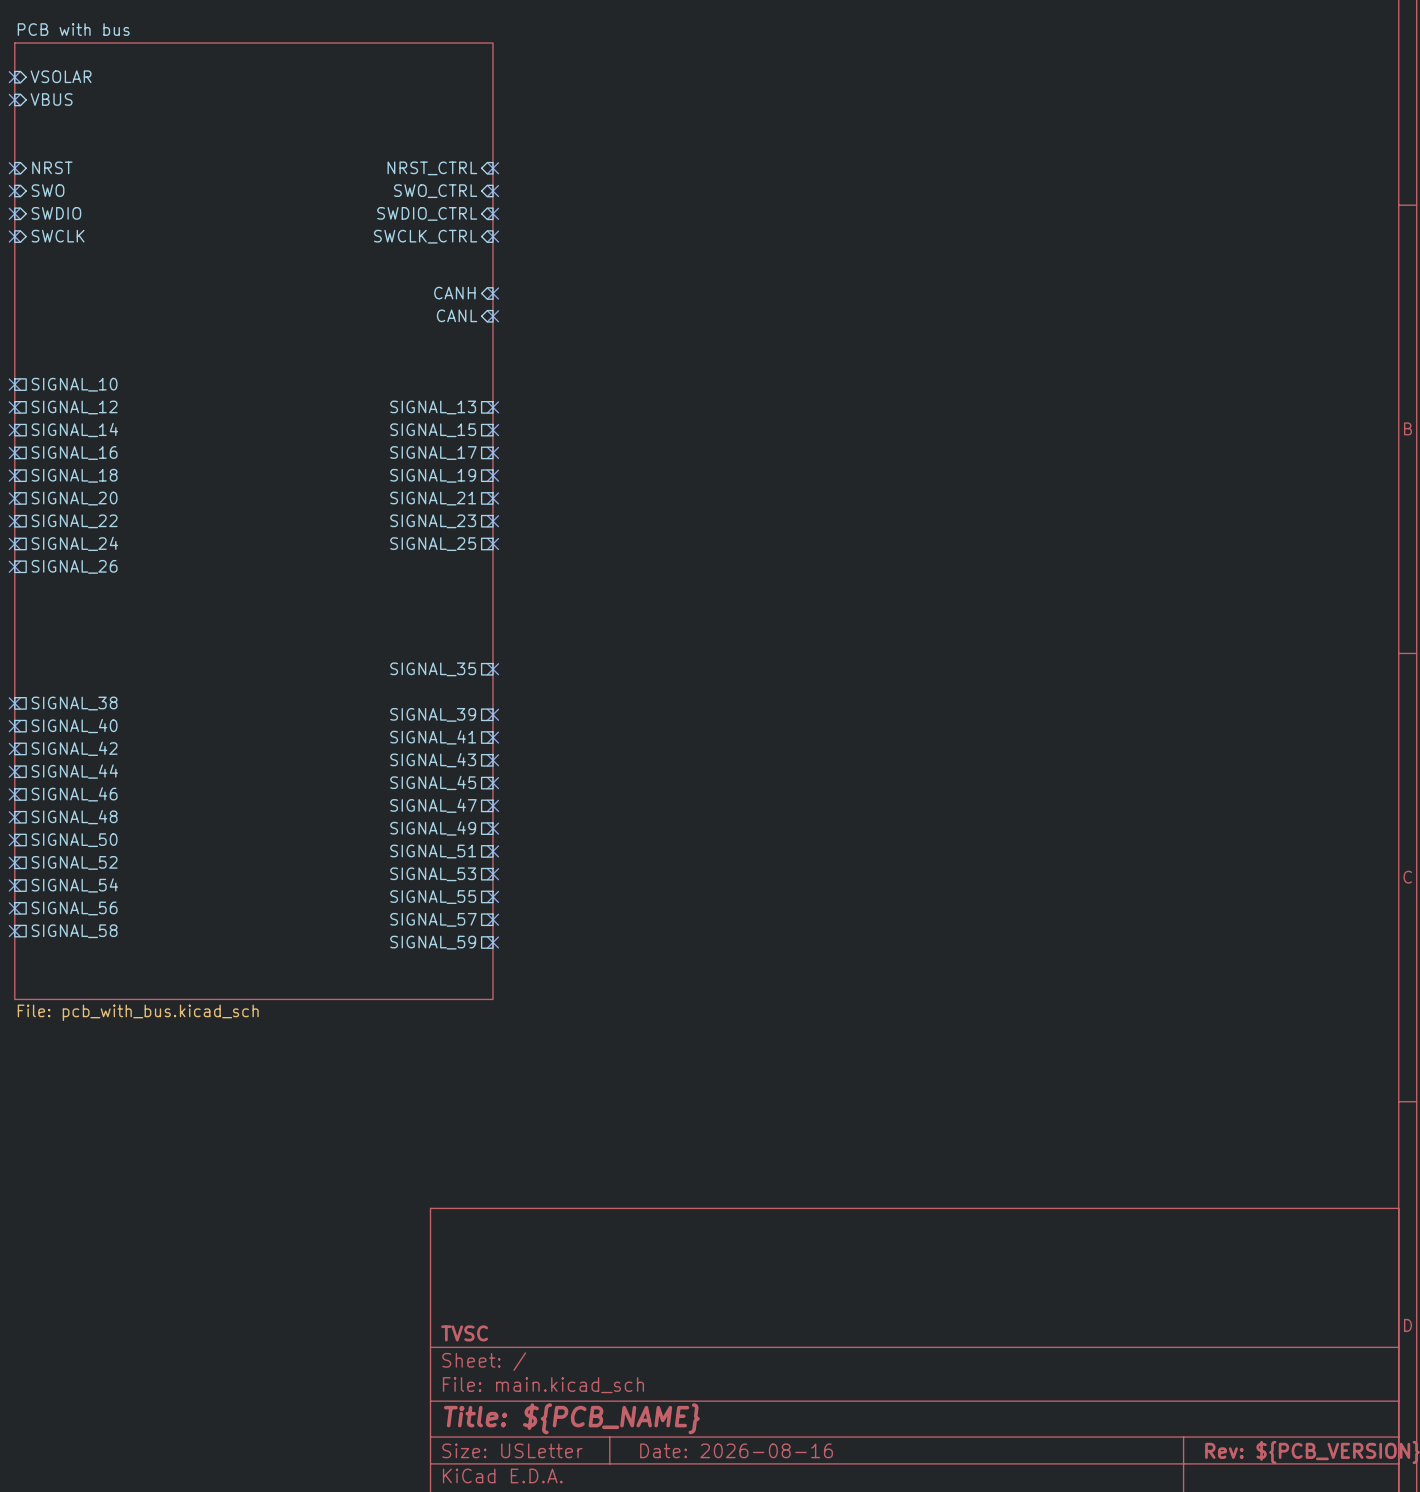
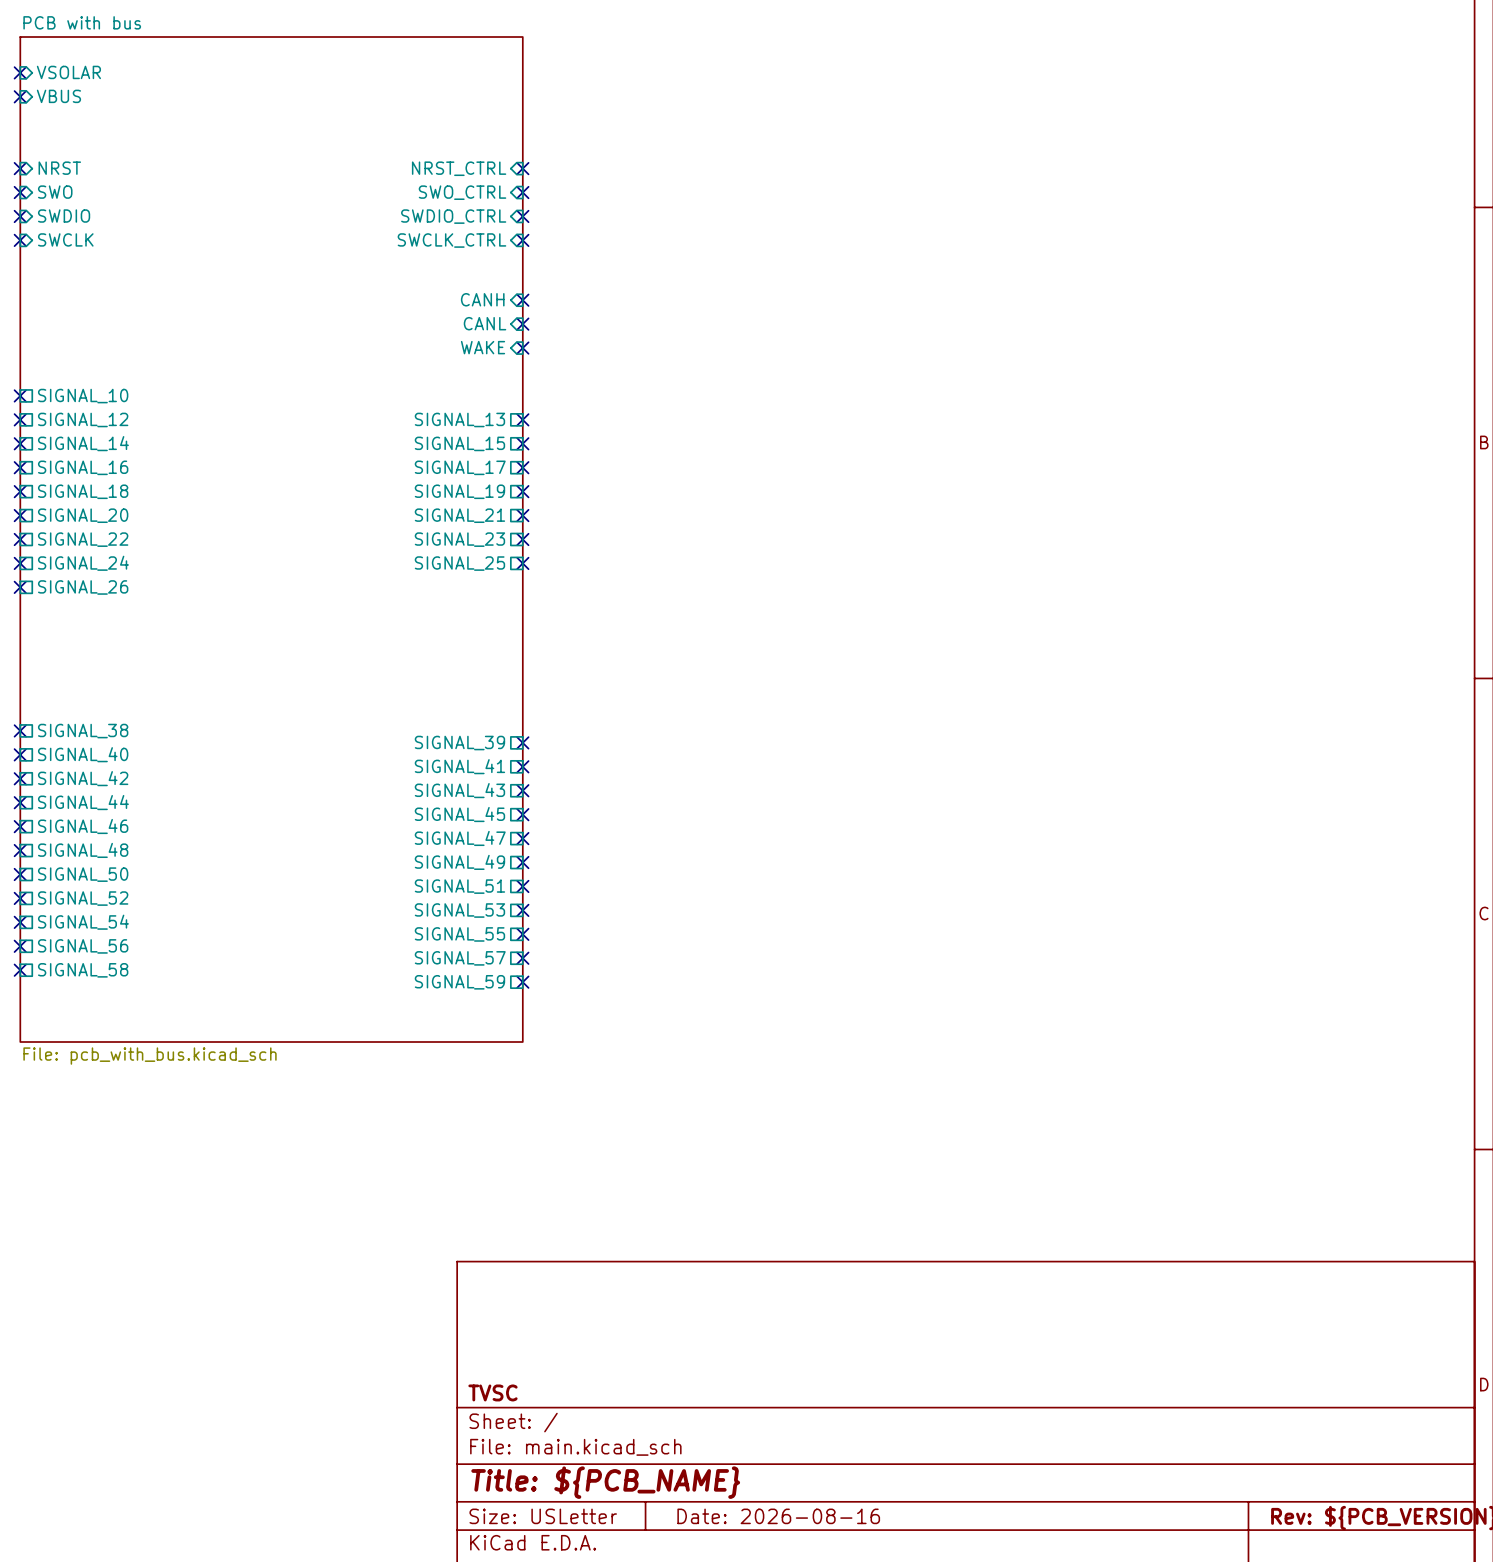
sheet pin: none -> WAKE (483, 347)
no-connect mark: none -> (522, 348)
sheet pin: SIGNAL_35 (433, 669) -> none
no-connect mark: (492, 669) -> none

